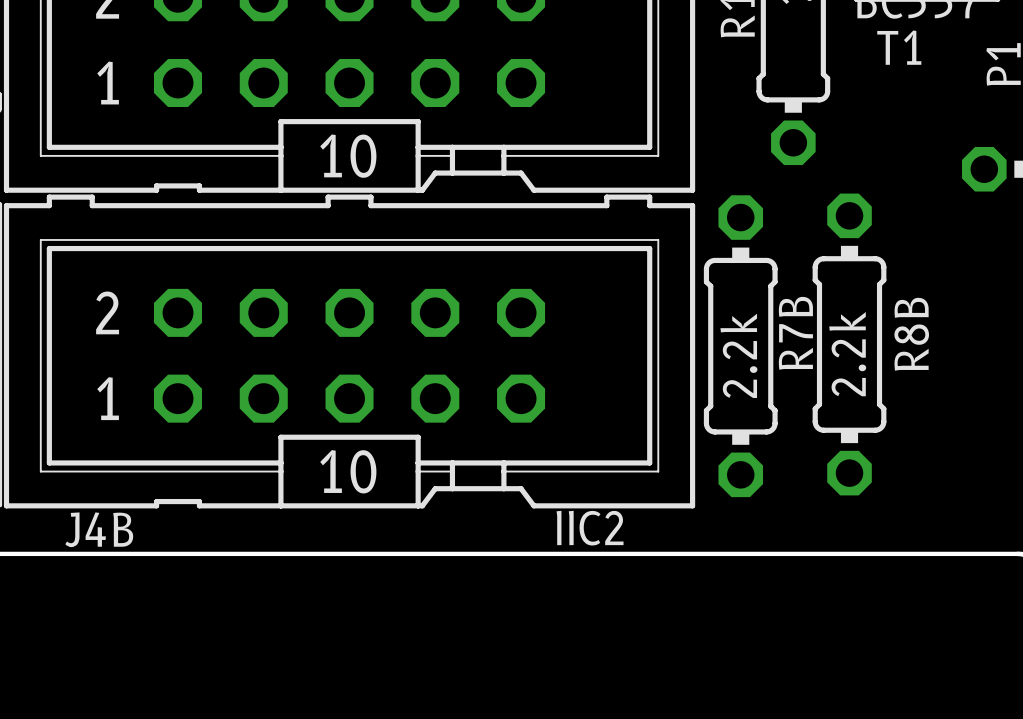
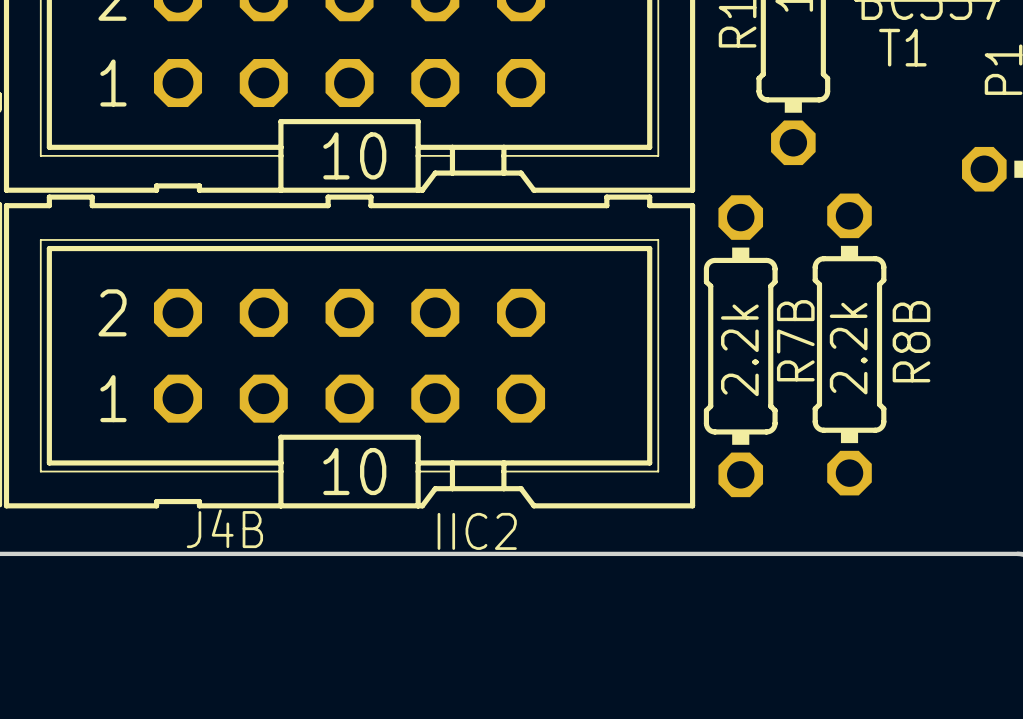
J4B value position: IIC2 (590, 528) -> IIC2 (477, 531)
J4B name position: J4B (99, 529) -> J4B (224, 528)

